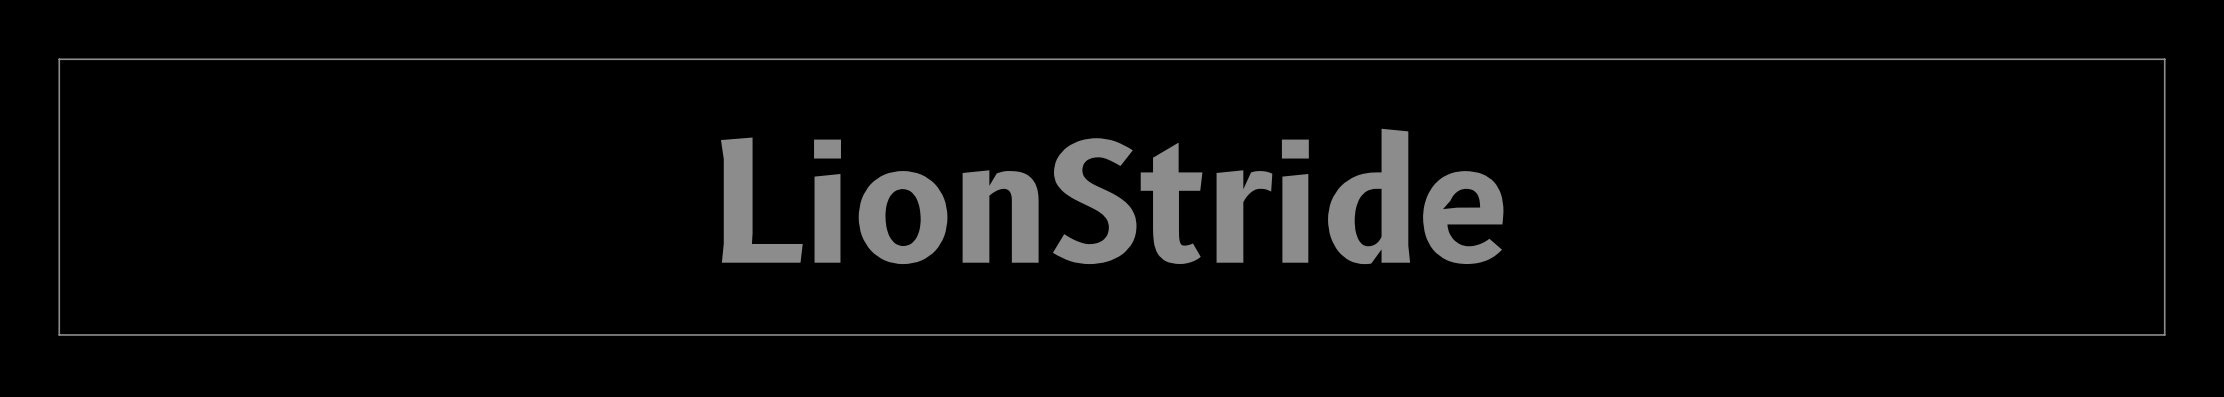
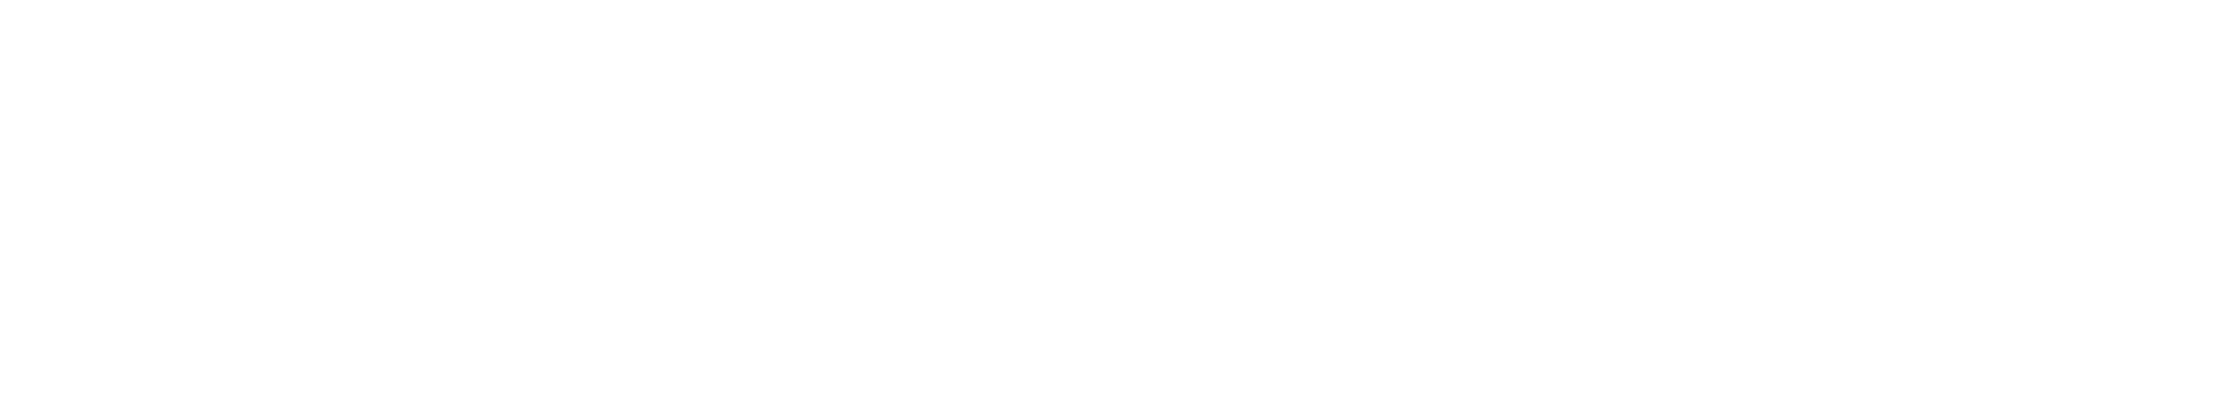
line: (59, 59) (2164, 59) (2164, 334) (59, 334) (59, 59) -> none
text: LionStride (1112, 196) -> none

